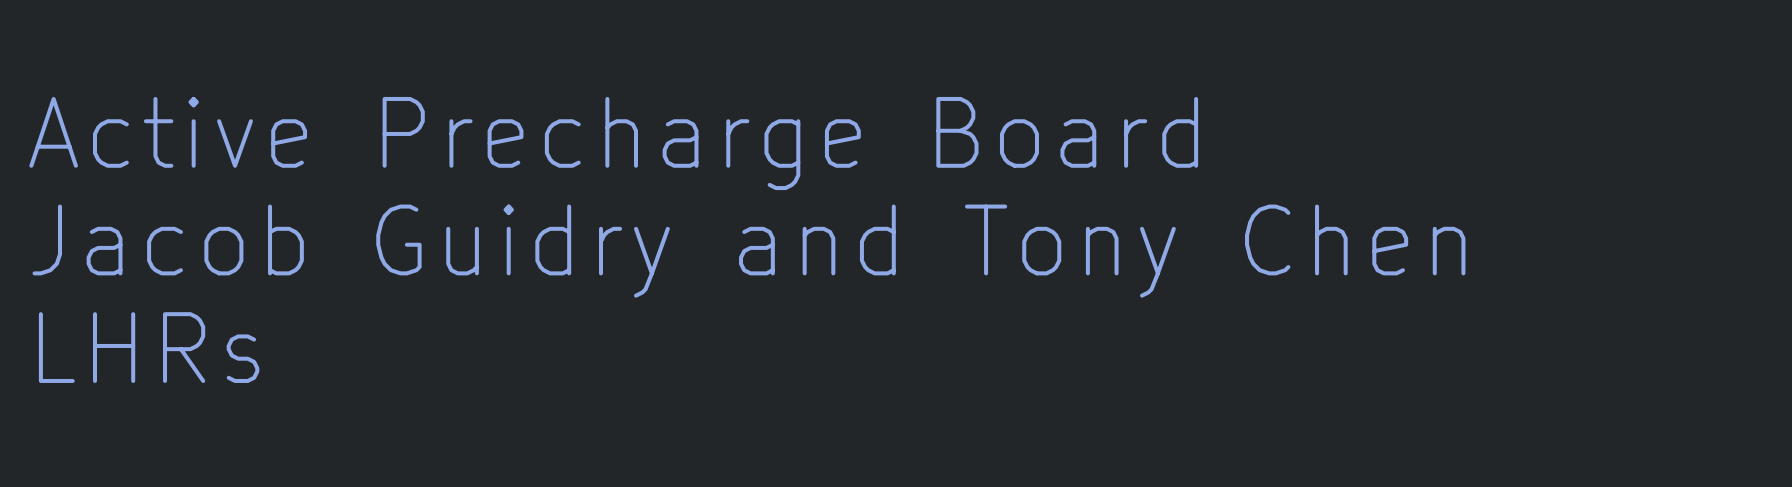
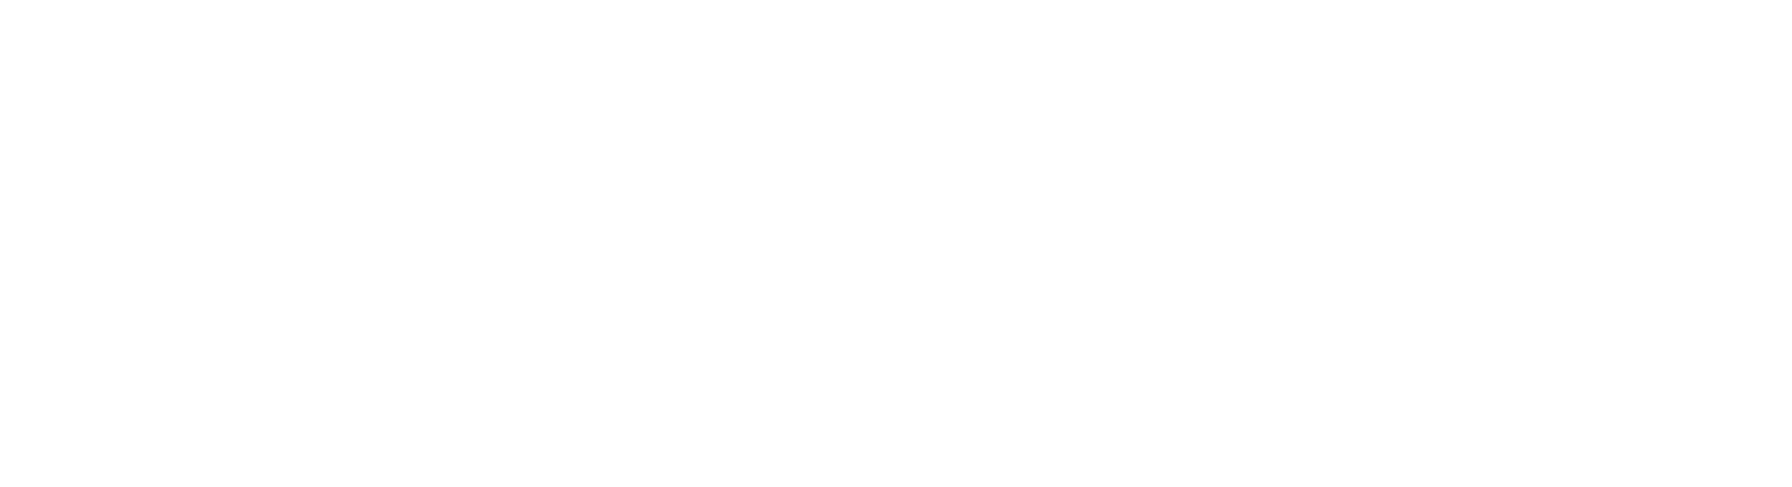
text: Active Precharge Board (613, 143) -> none
text: Jacob Guidry and Tony Chen (748, 251) -> none
text: LHRs (149, 347) -> none

